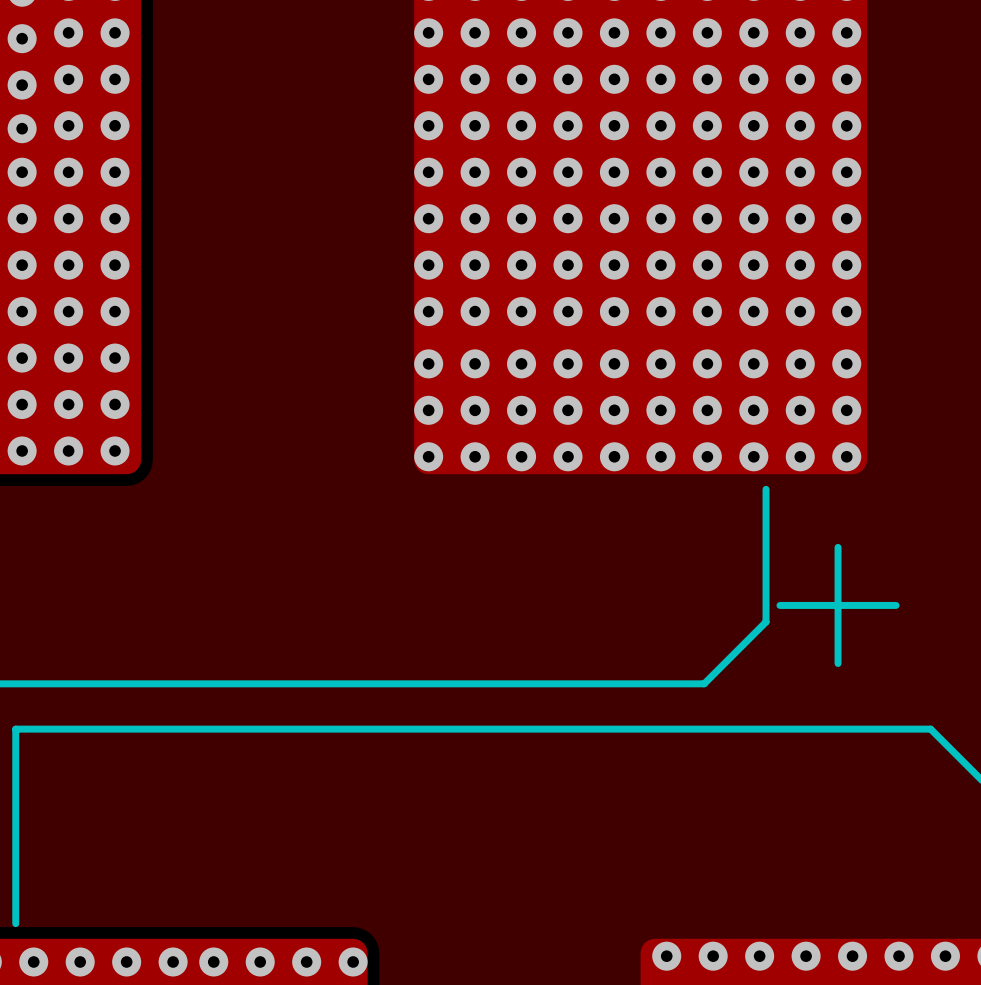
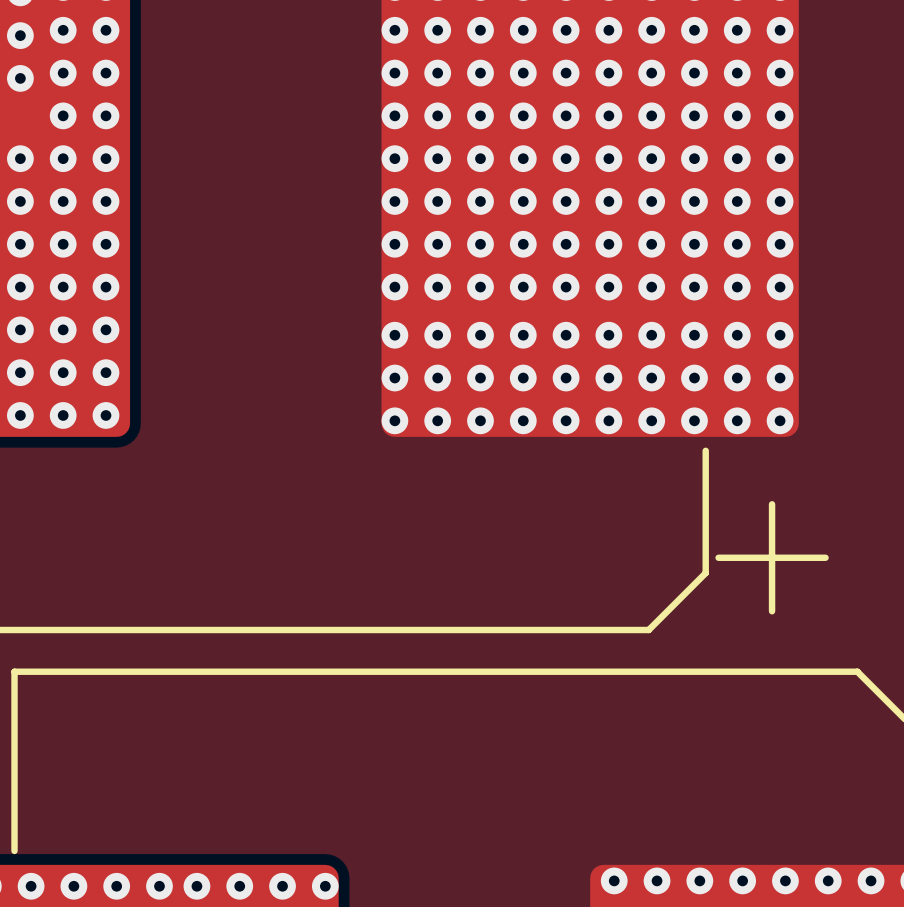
via: (22, 128) -> none

